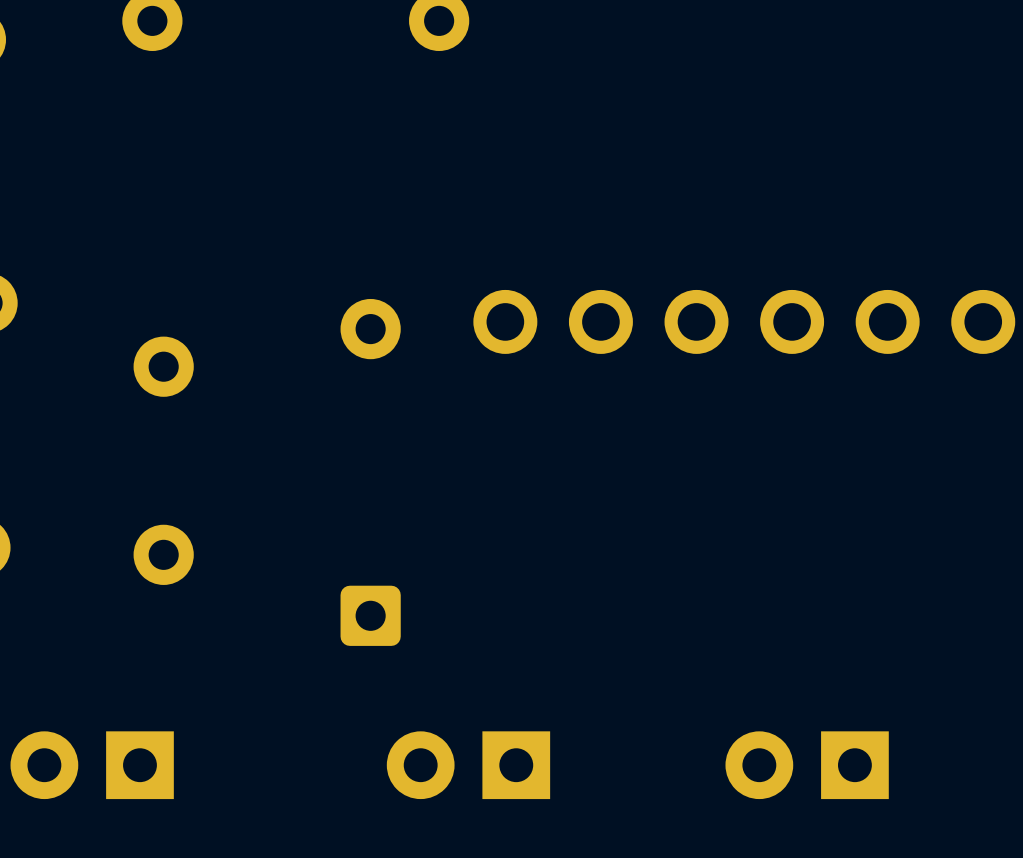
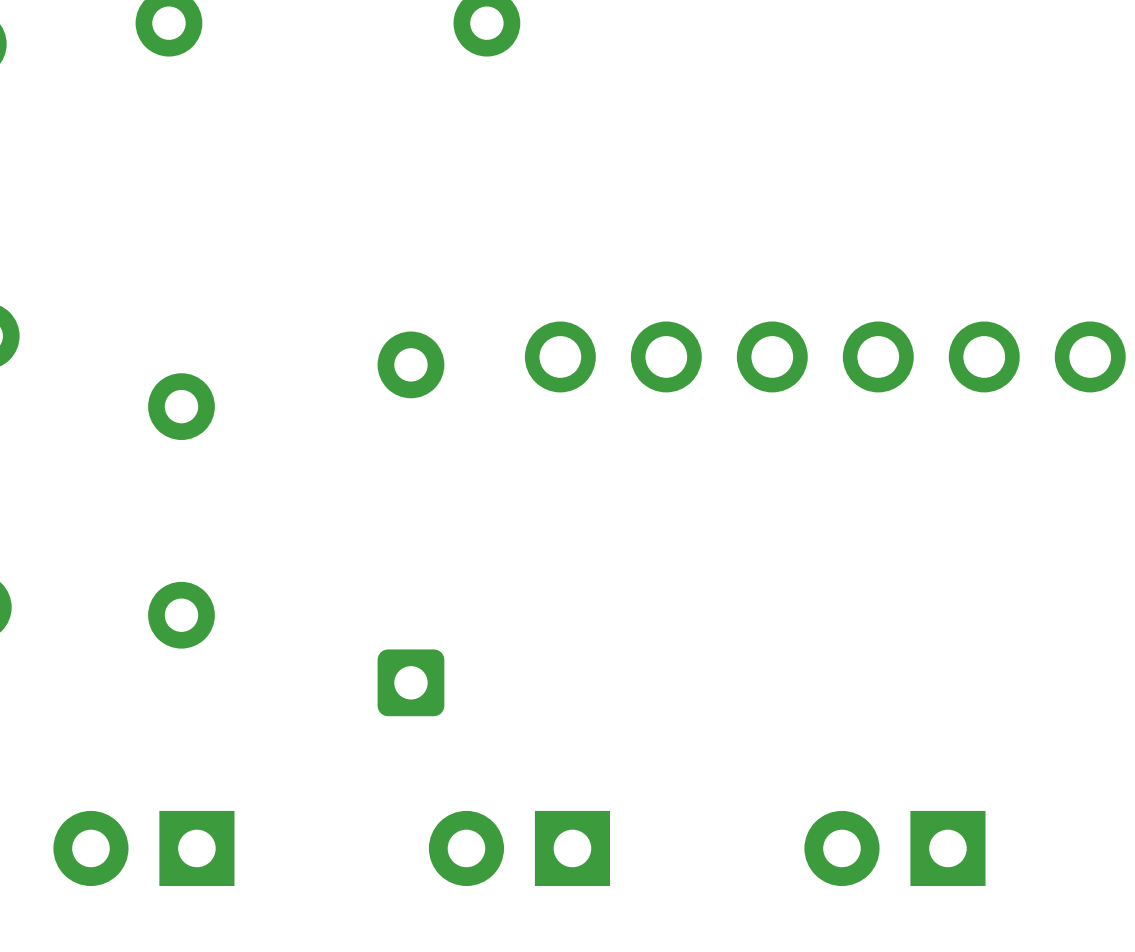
part position: (92, 765) -> (143, 848)

